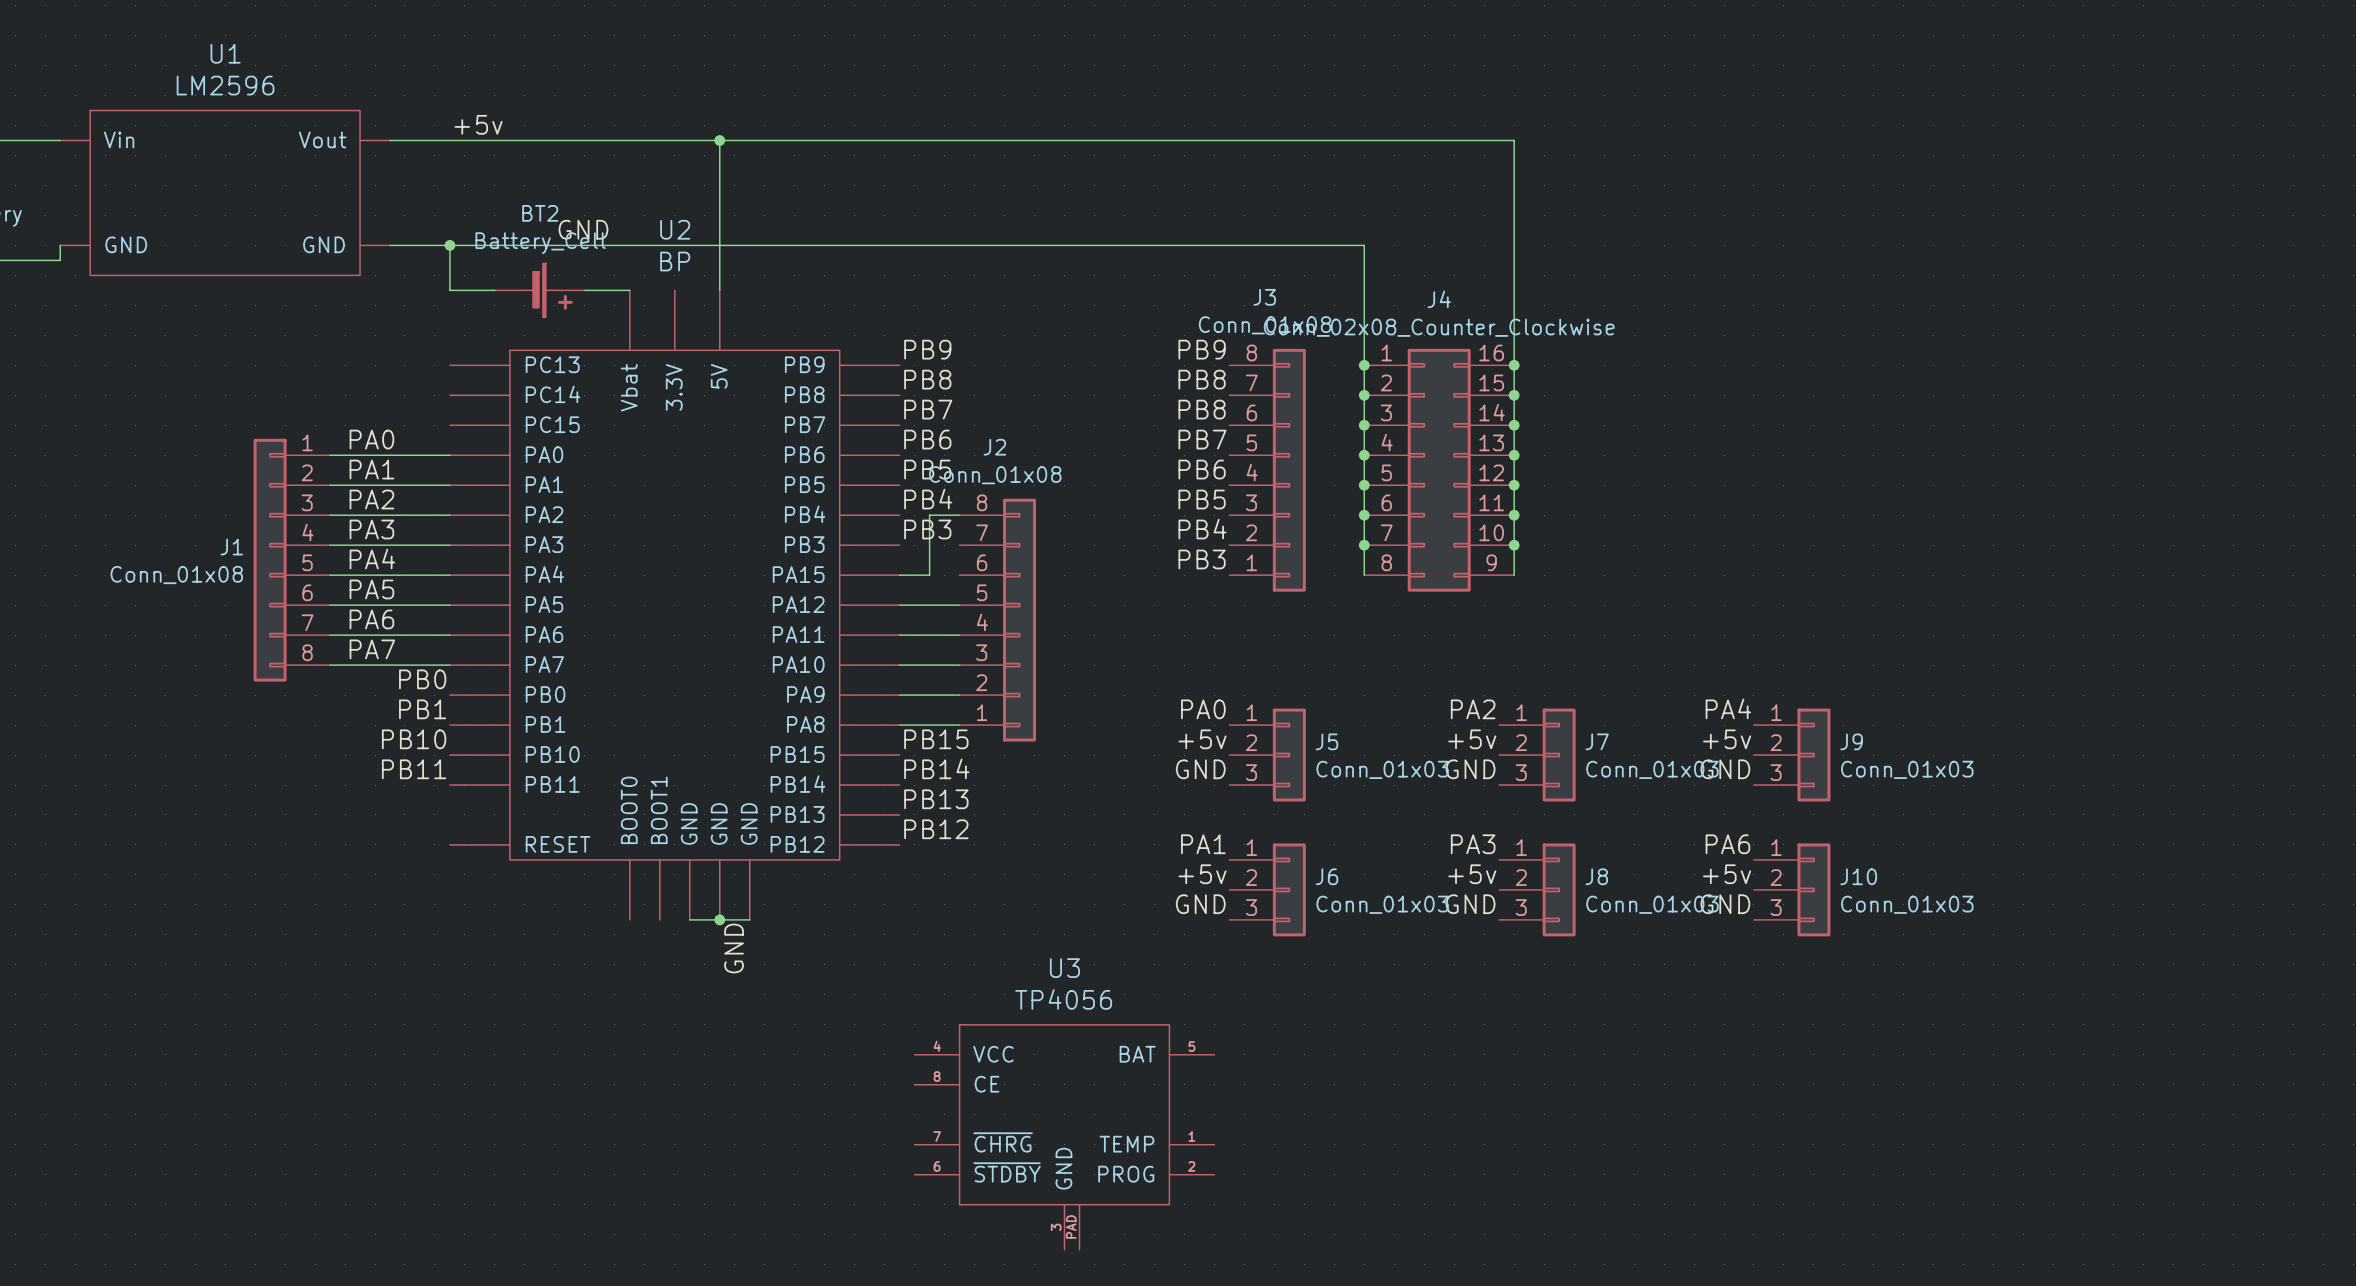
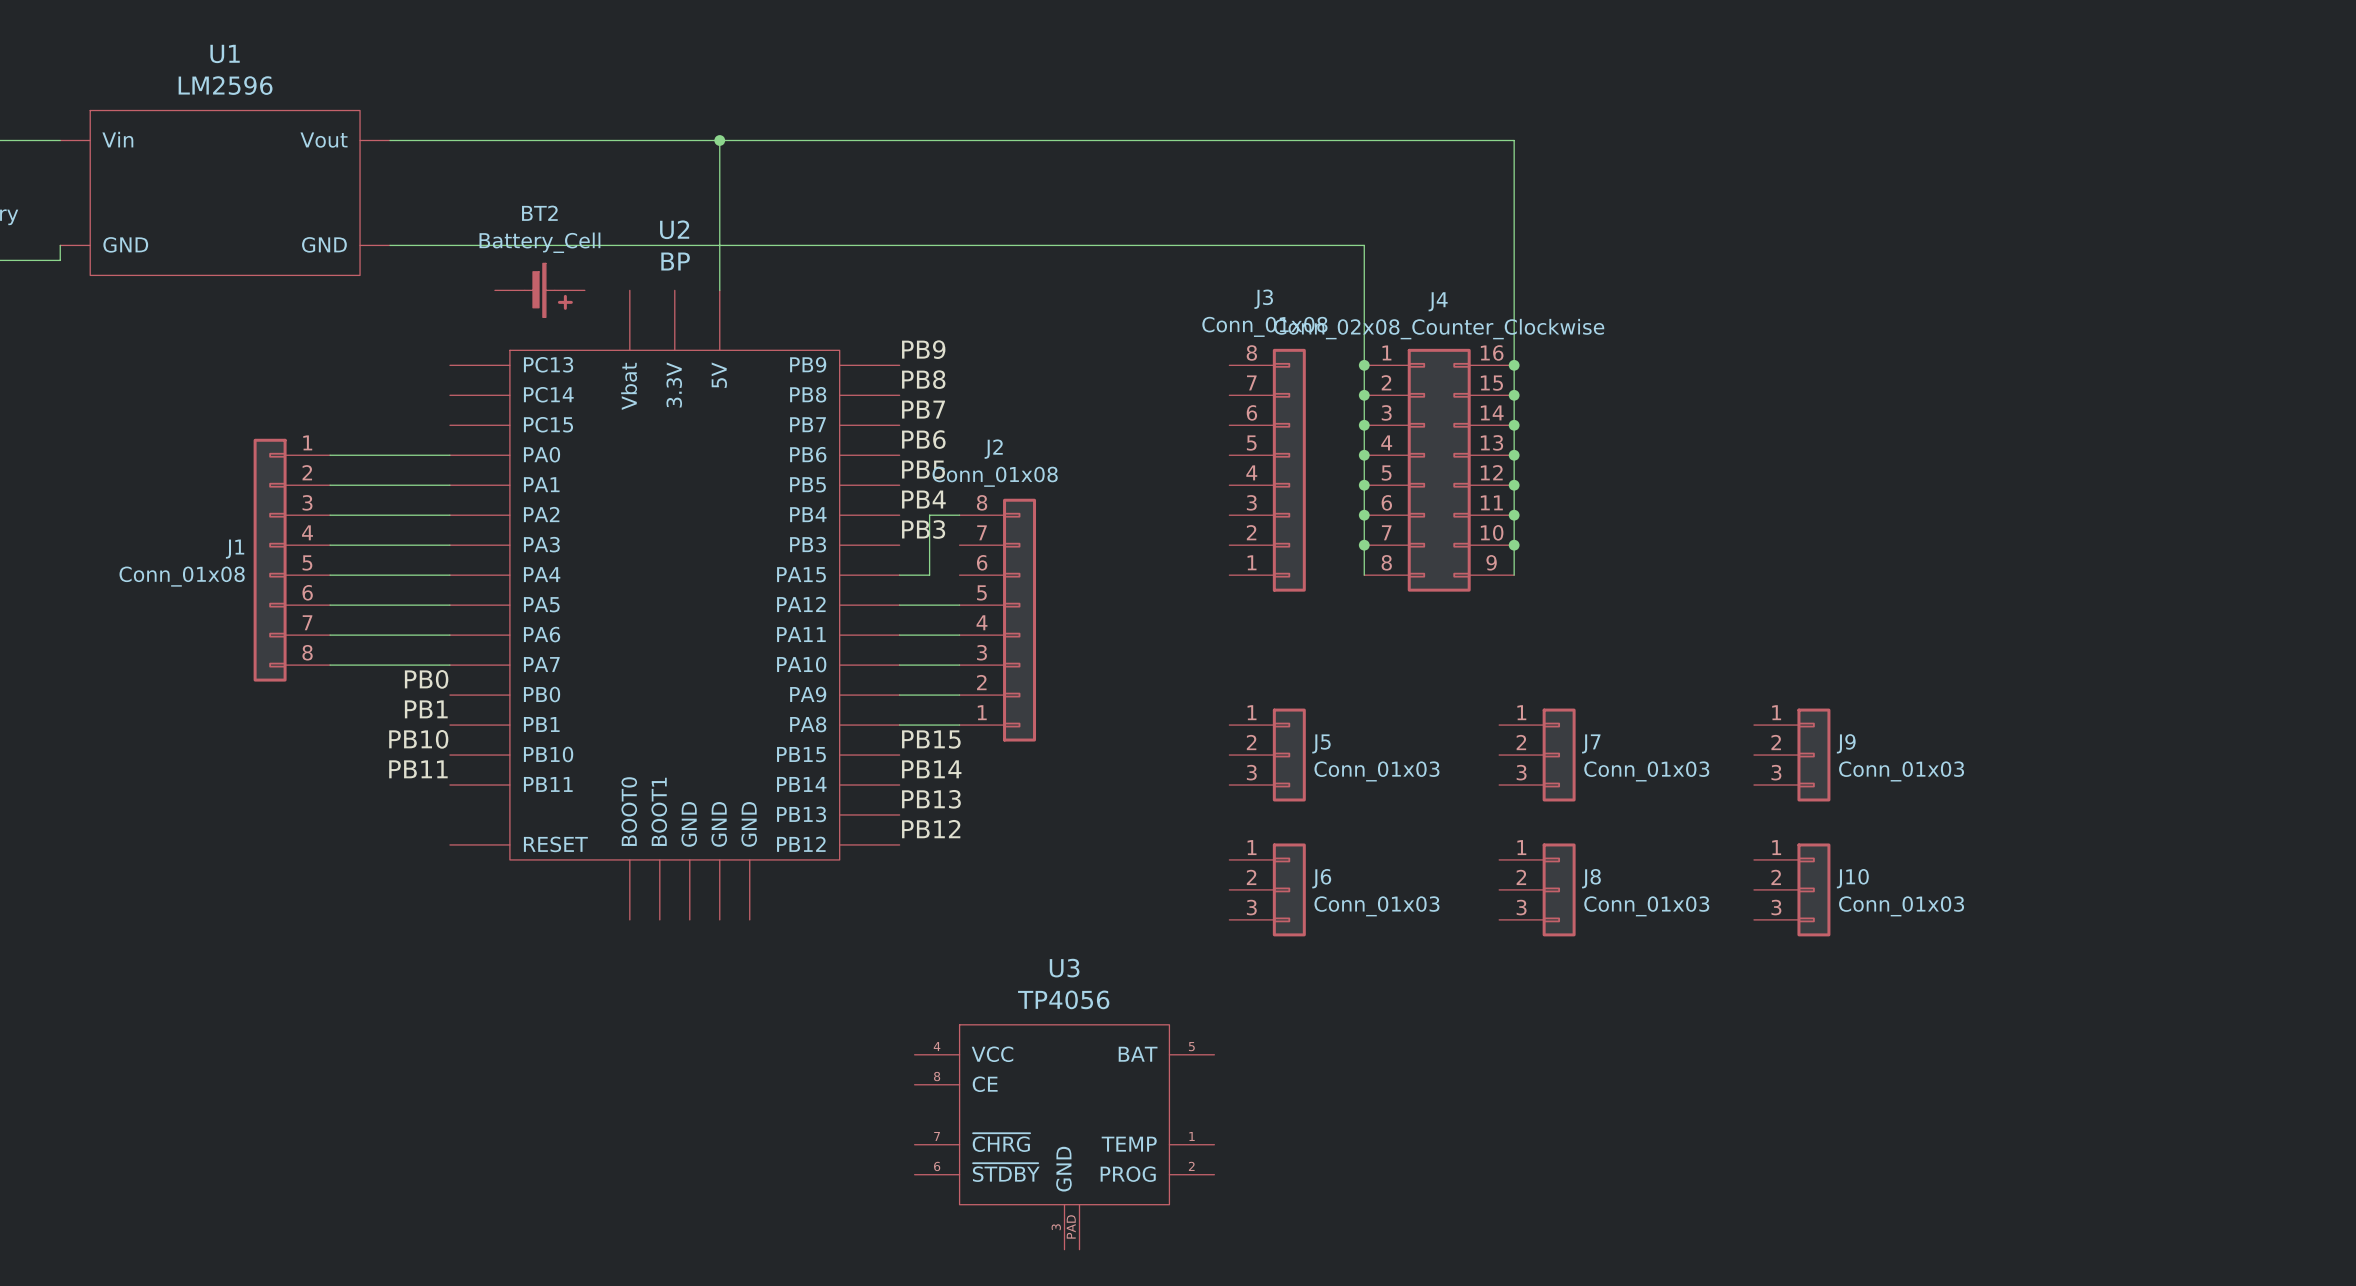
label: +5v (478, 124) -> none
label: GND (583, 229) -> none
wire: (449, 245) (449, 290) (494, 290) -> none
junction: (449, 245) -> none
wire: (584, 290) (629, 290) -> none
label: PB9 (1202, 349) -> none
label: PB8 (1202, 379) -> none
label: PB8 (1202, 409) -> none
label: PA0 (371, 439) -> none
label: PB7 (1202, 439) -> none
label: PA1 (371, 469) -> none
label: PB6 (1202, 469) -> none
label: PA2 (371, 499) -> none
label: PB5 (1202, 499) -> none
label: PA3 (371, 529) -> none
label: PB4 (1202, 529) -> none
label: PA4 (372, 559) -> none
label: PB3 (1202, 559) -> none
label: PA5 (371, 589) -> none
label: PA6 (371, 619) -> none
label: PA7 (372, 649) -> none
label: PA4 (1728, 708) -> none
label: PA0 (1203, 709) -> none
label: PA2 (1473, 709) -> none
label: +5v (1202, 739) -> none
label: +5v (1472, 739) -> none
label: +5v (1727, 739) -> none
label: GND (1200, 769) -> none
label: GND (1470, 769) -> none
label: GND (1725, 769) -> none
label: PA1 (1203, 844) -> none
label: PA3 (1473, 844) -> none
label: PA6 (1727, 844) -> none
label: +5v (1202, 874) -> none
label: +5v (1472, 874) -> none
label: +5v (1727, 874) -> none
label: GND (1200, 904) -> none
label: GND (1470, 904) -> none
label: GND (1725, 904) -> none
wire: (689, 919) (749, 919) -> none
junction: (719, 919) -> none
label: GND (734, 948) -> none

